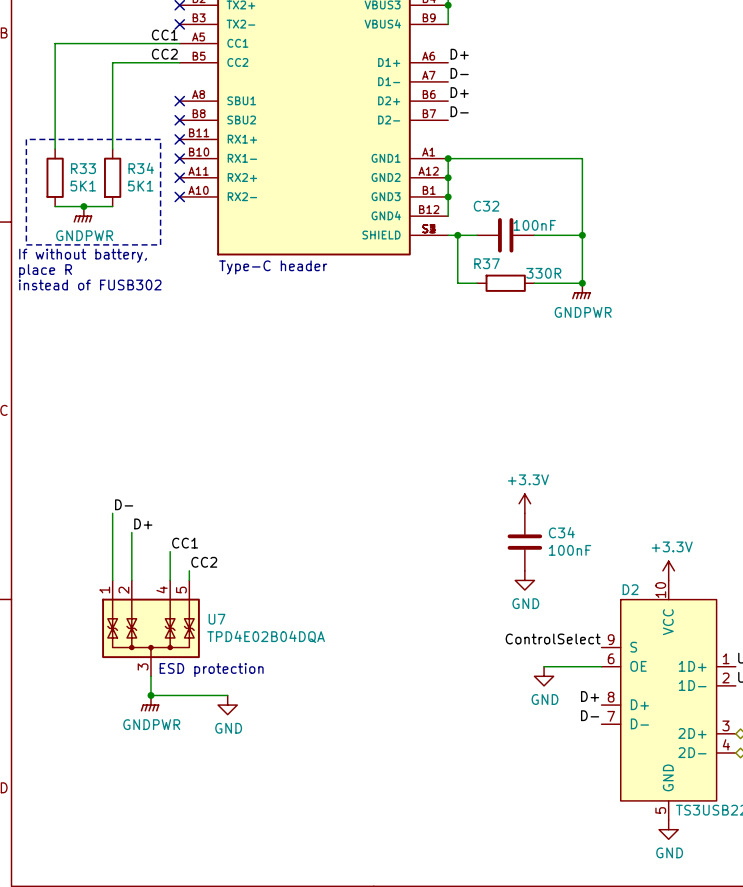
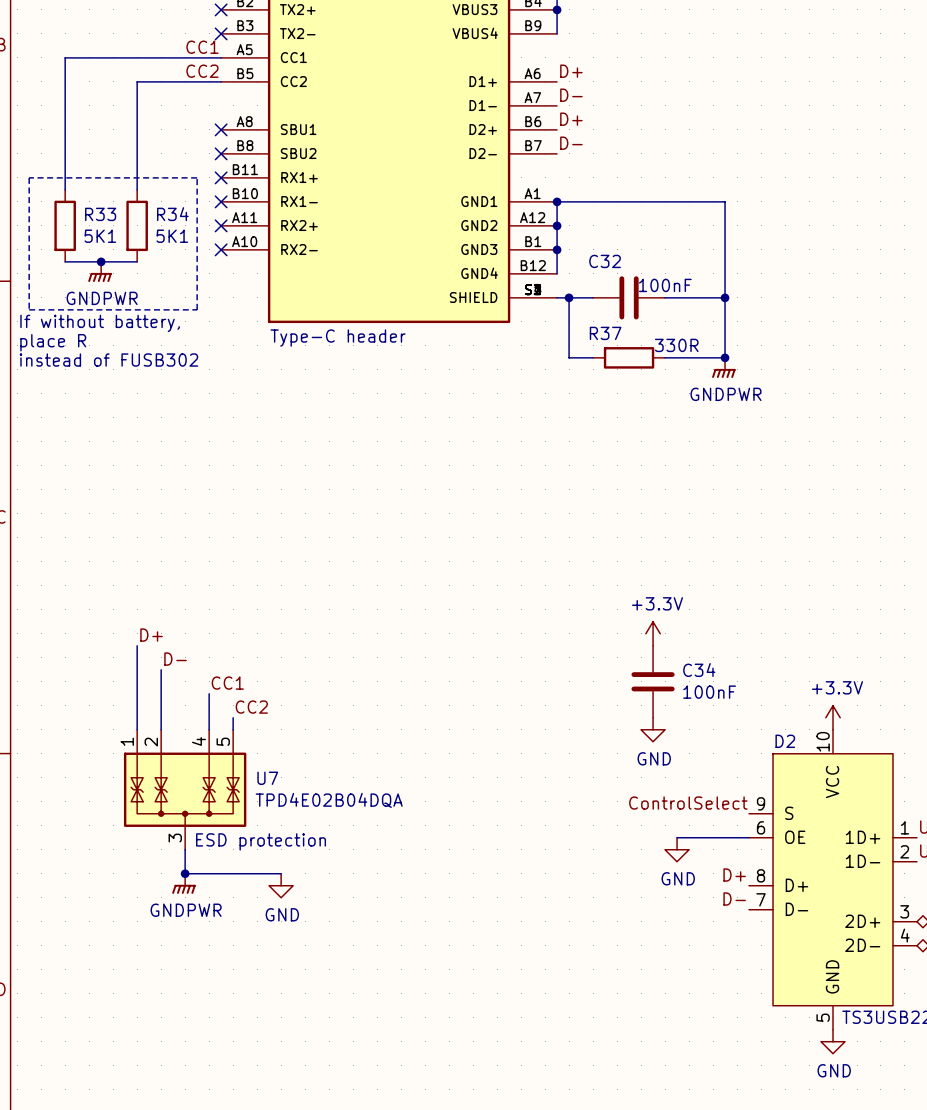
label: D- (124, 504) -> D+ (151, 635)
label: D+ (143, 523) -> D- (175, 659)

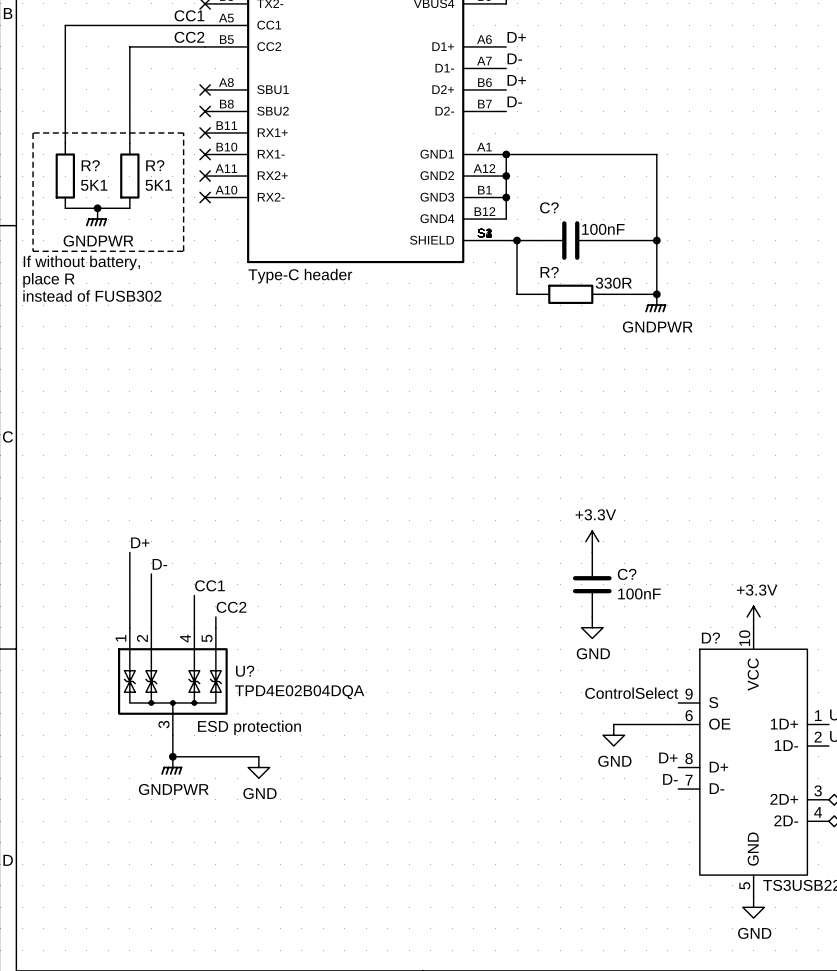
R33 name: R33 (100, 214) -> R? (90, 165)
R34 name: R34 (172, 214) -> R? (155, 165)
C32 name: C32 (605, 261) -> C? (549, 207)
R37 name: R37 (605, 333) -> R? (549, 272)
C34 name: C34 (699, 670) -> C? (627, 574)
D2 name: D2 (785, 741) -> D? (710, 637)
U7 name: U7 (267, 778) -> U? (245, 671)

